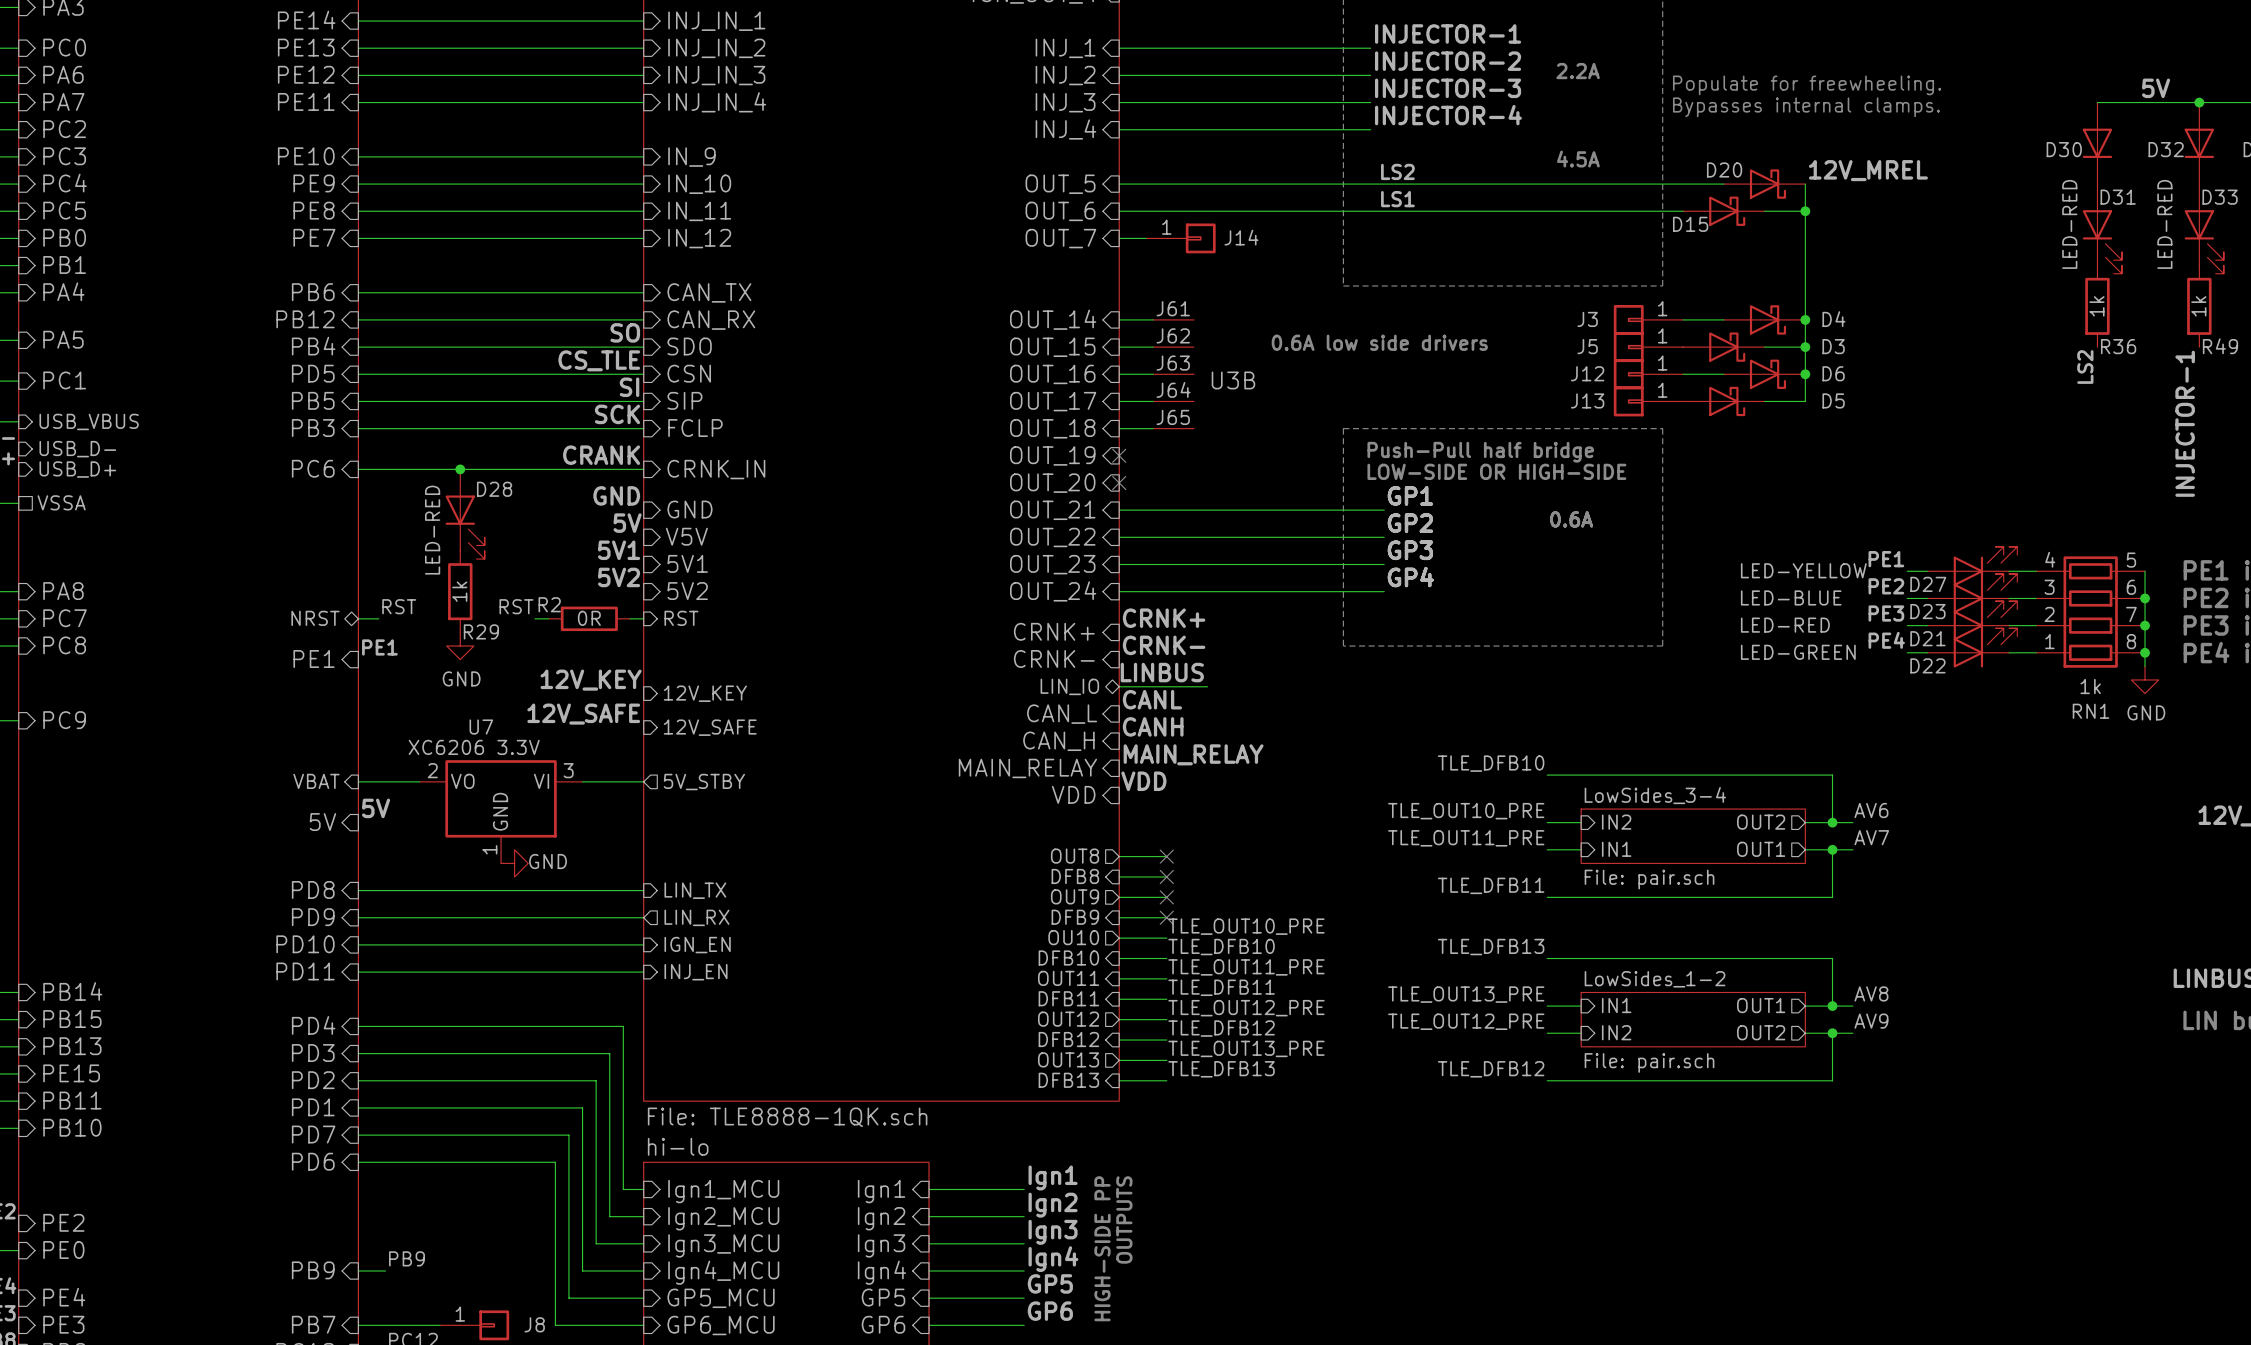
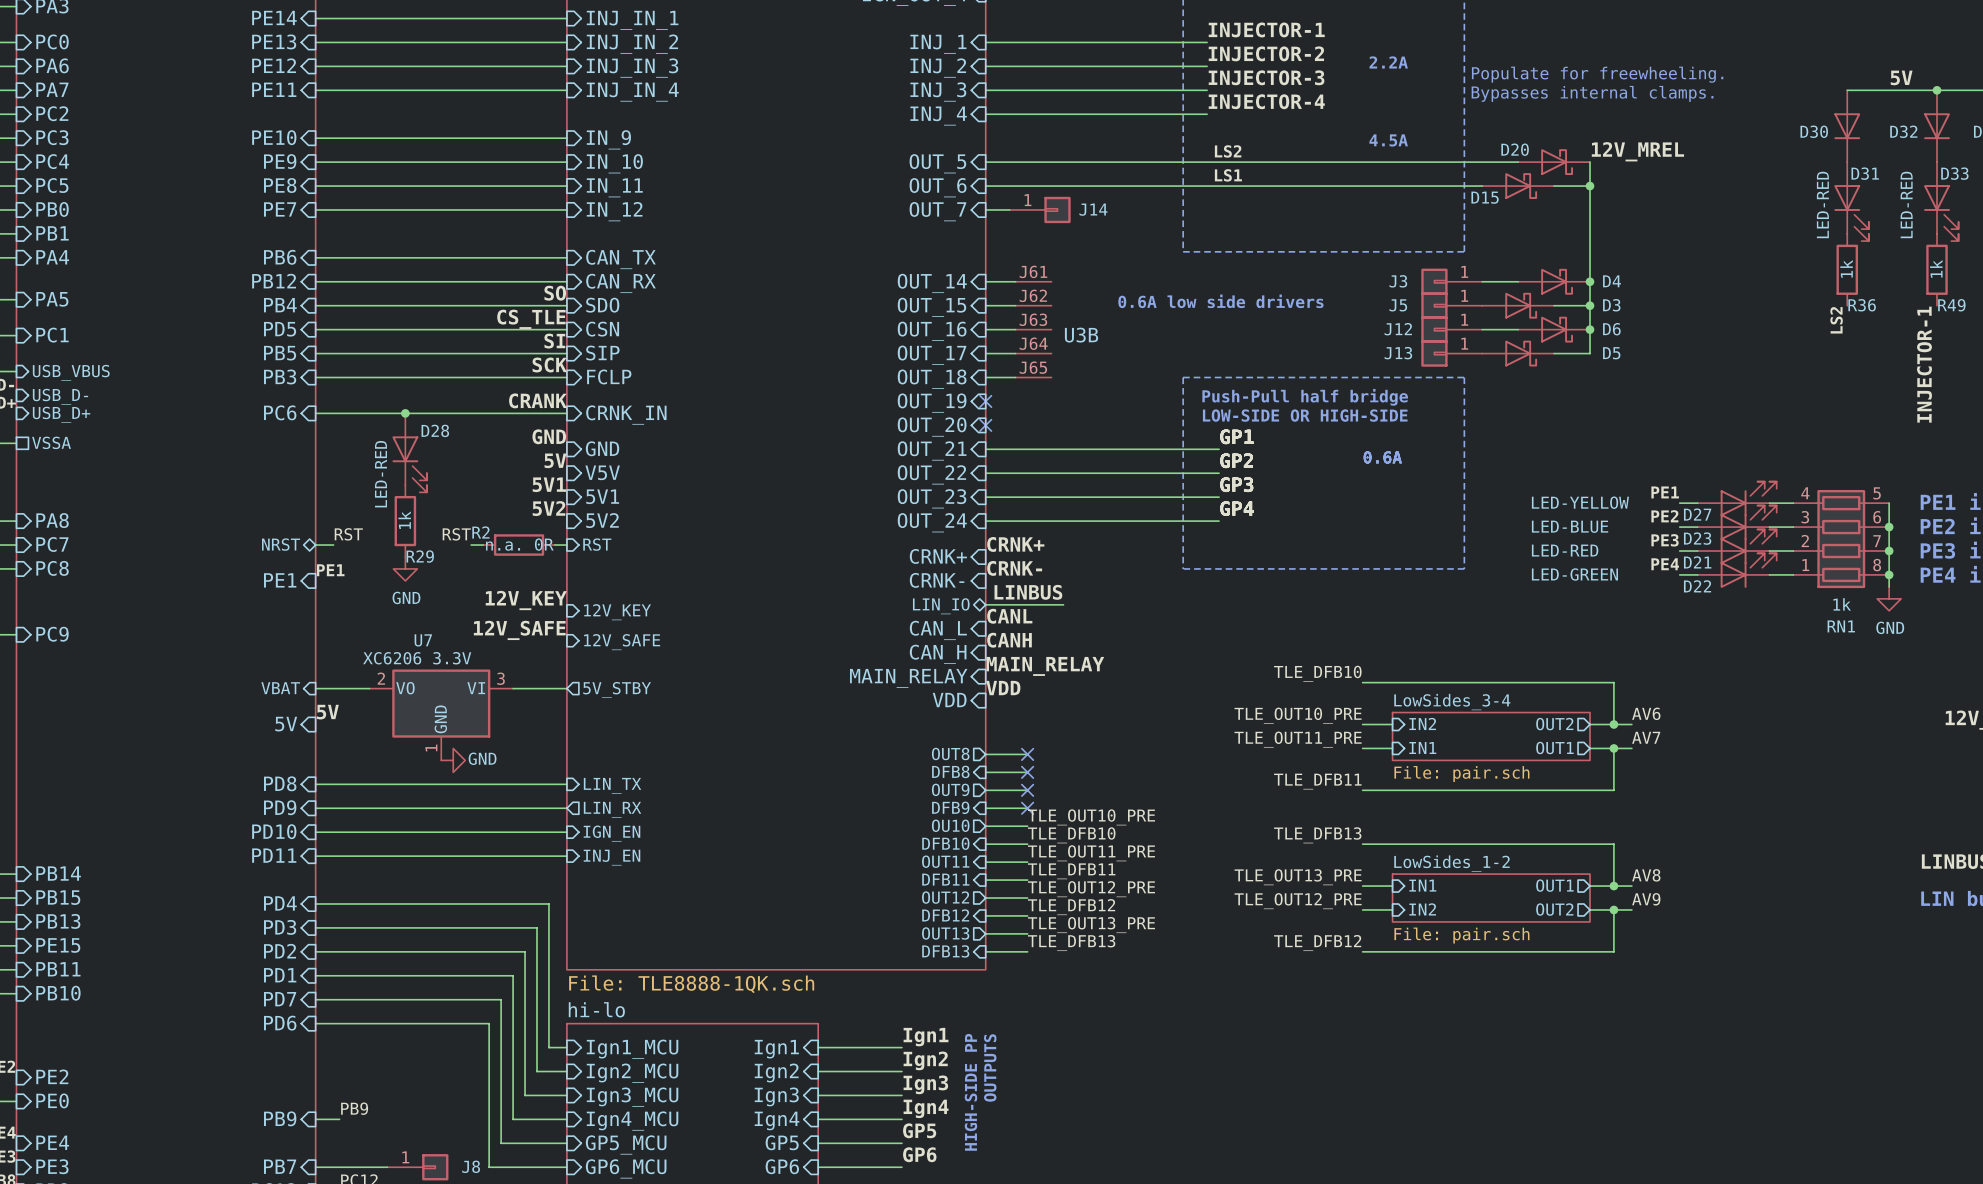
R2 value: 0R (589, 618) -> n.a. 0R (519, 544)

